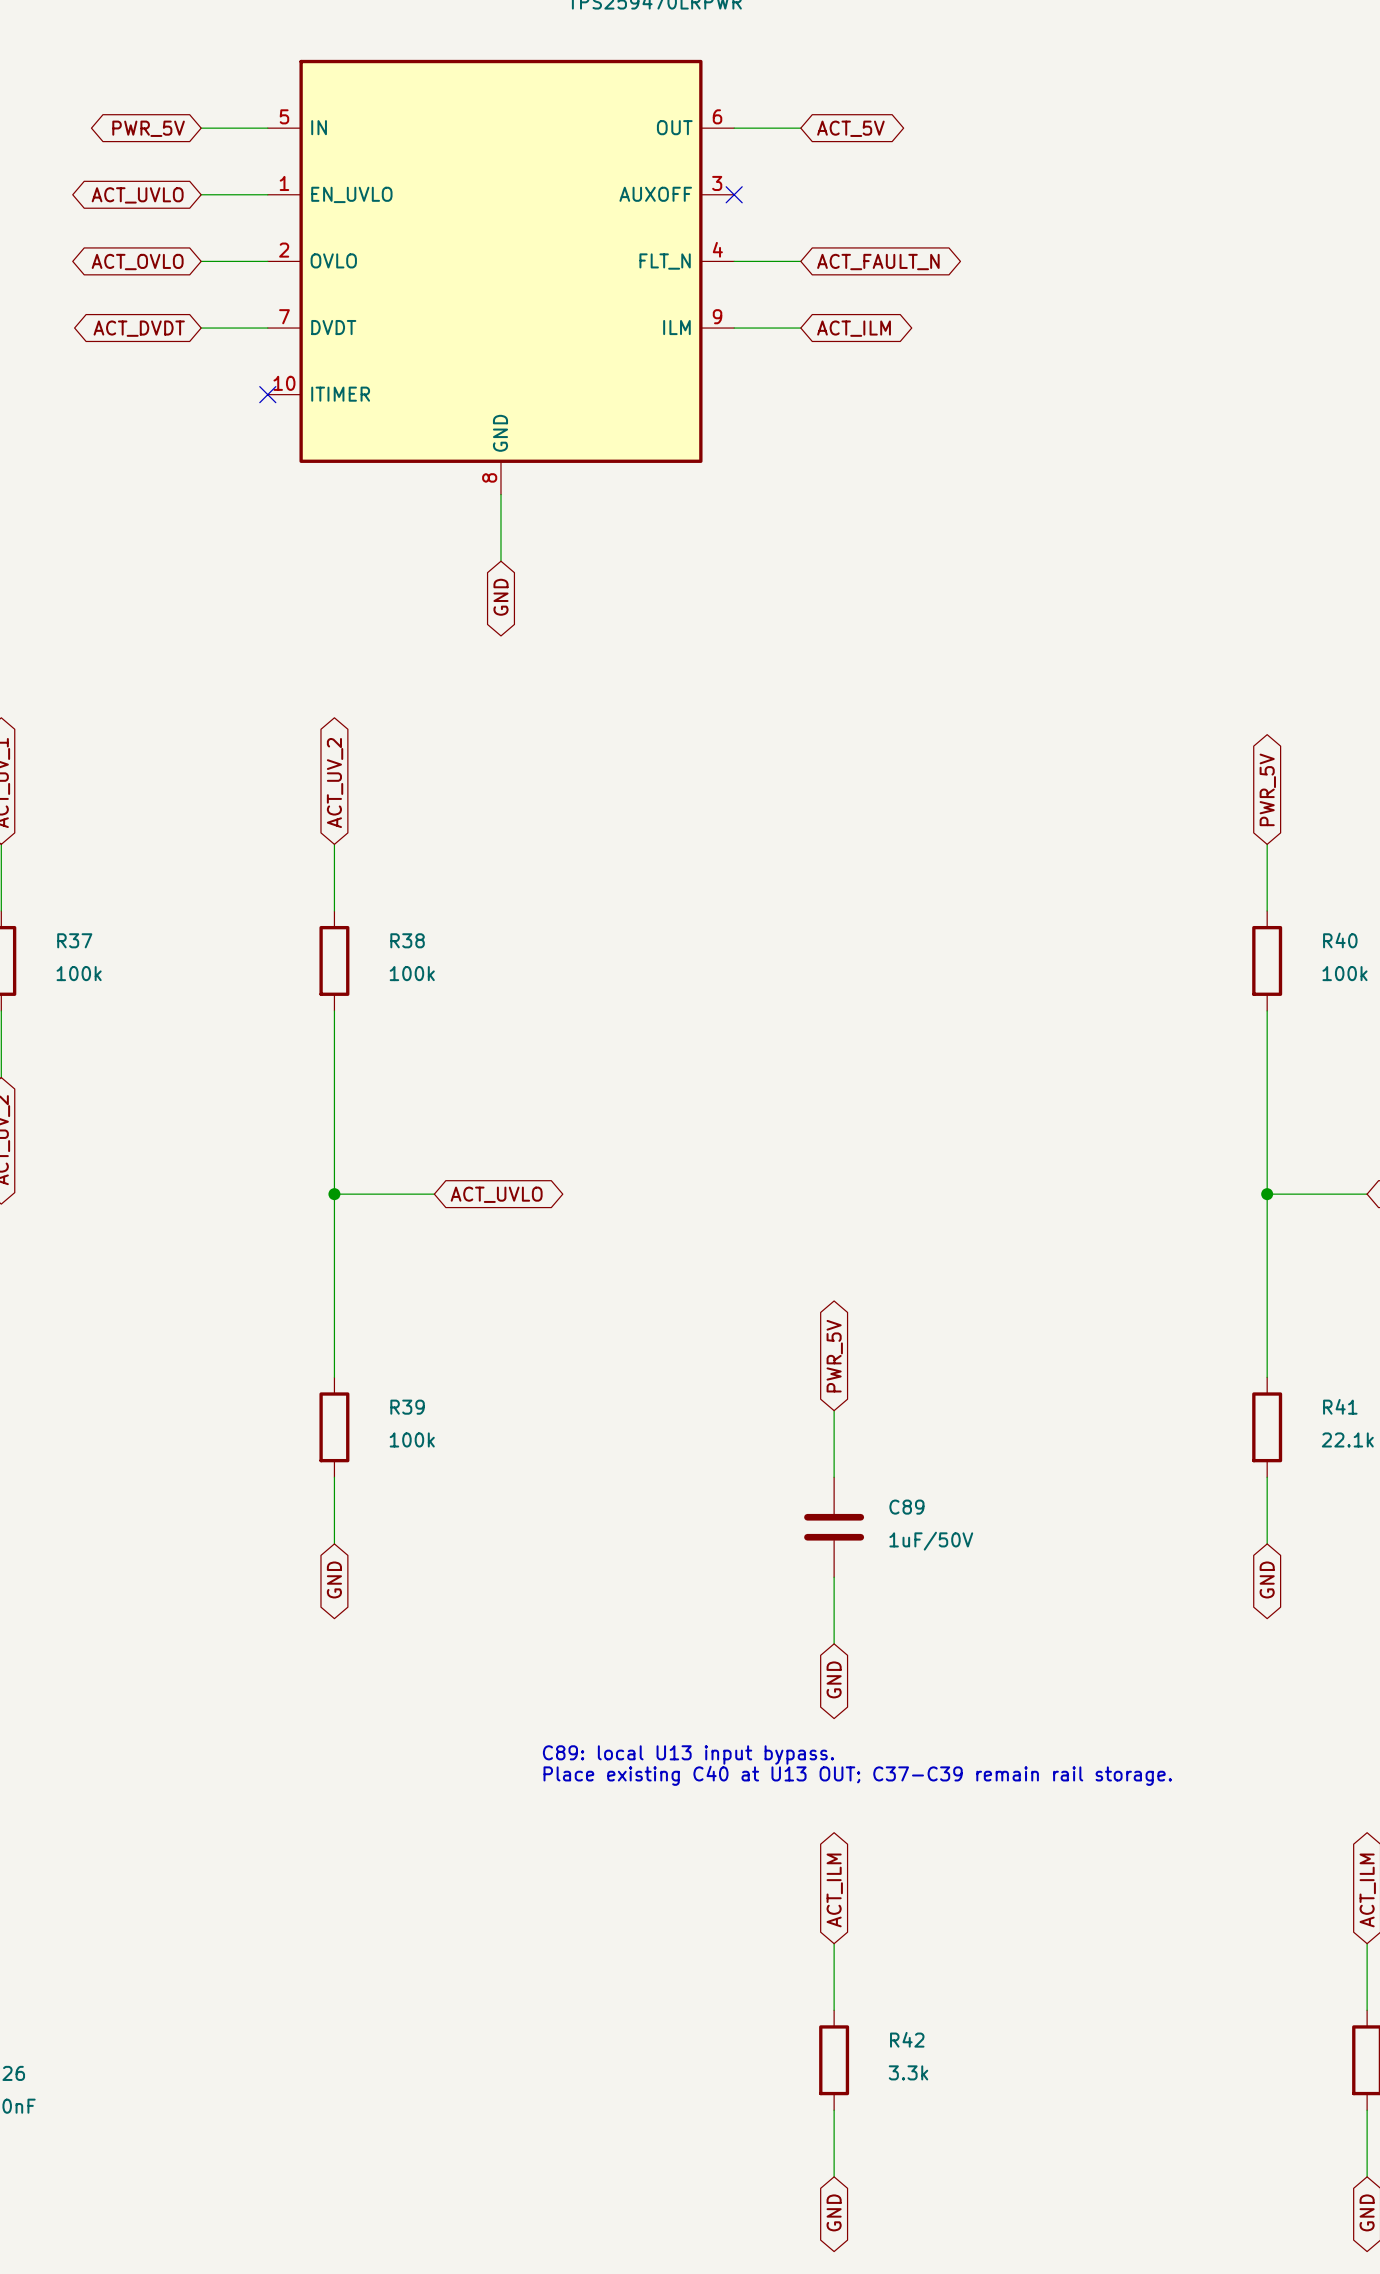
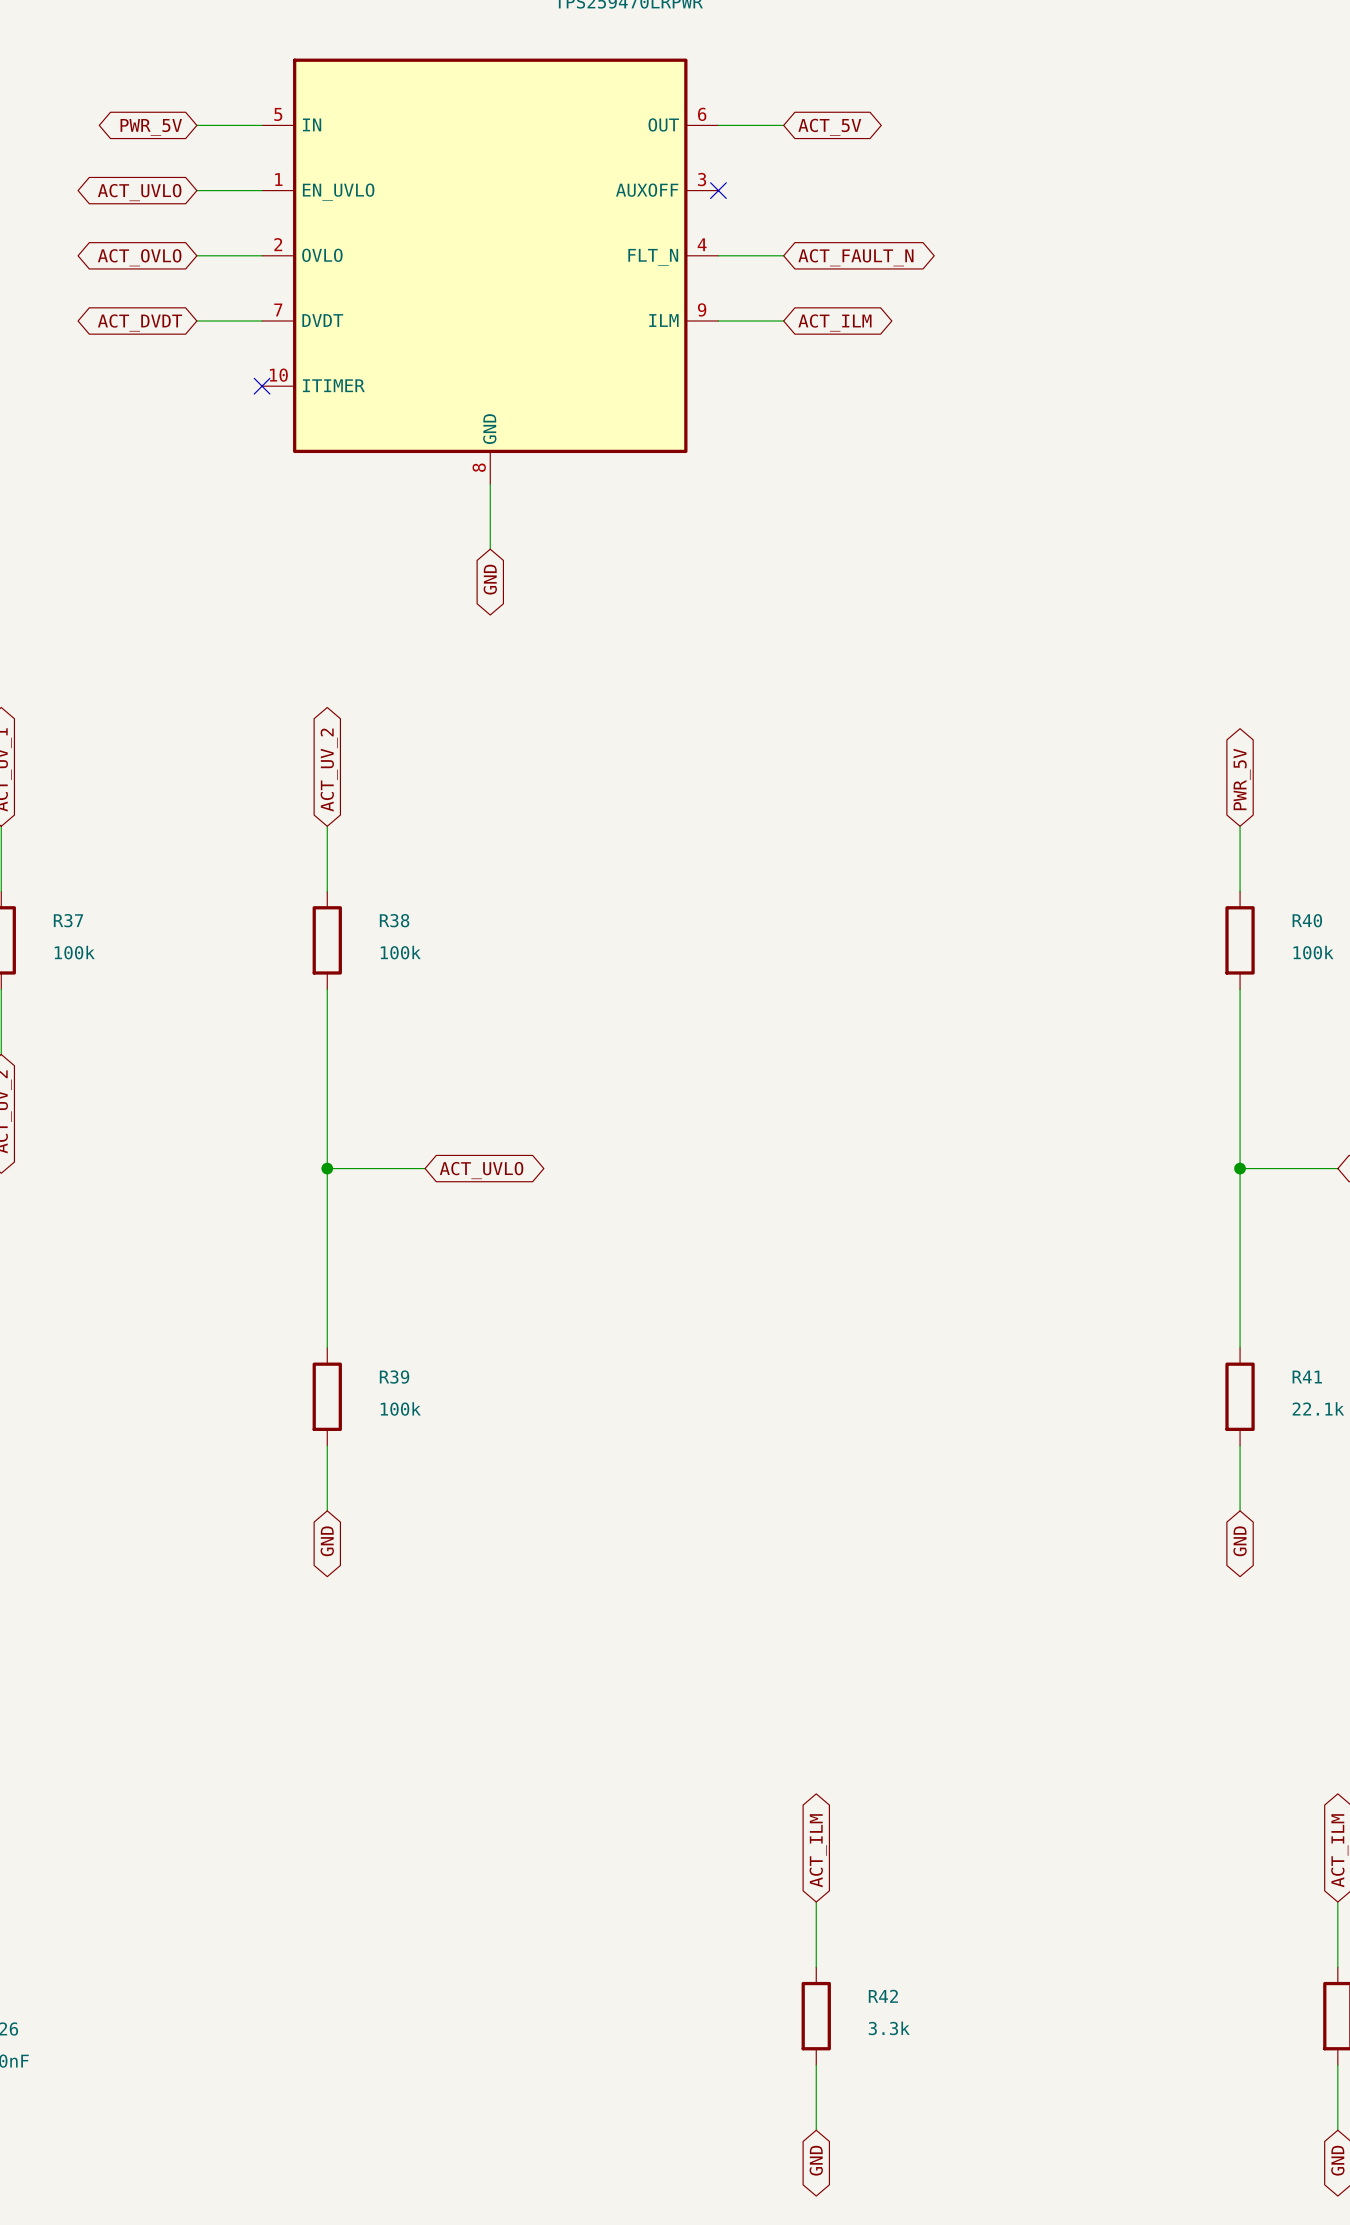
global label: PWR_5V (834, 1356) -> none
wire: (834, 1410) (834, 1477) -> none
C89: 1uF/50V (834, 1527) -> none
wire: (834, 1577) (834, 1643) -> none
global label: GND (834, 1679) -> none
text: C89: local U13 input bypass. (688, 1754) -> none
text: Place existing C40 at U13 OUT; C37-C39 remain rail storage. (857, 1775) -> none

